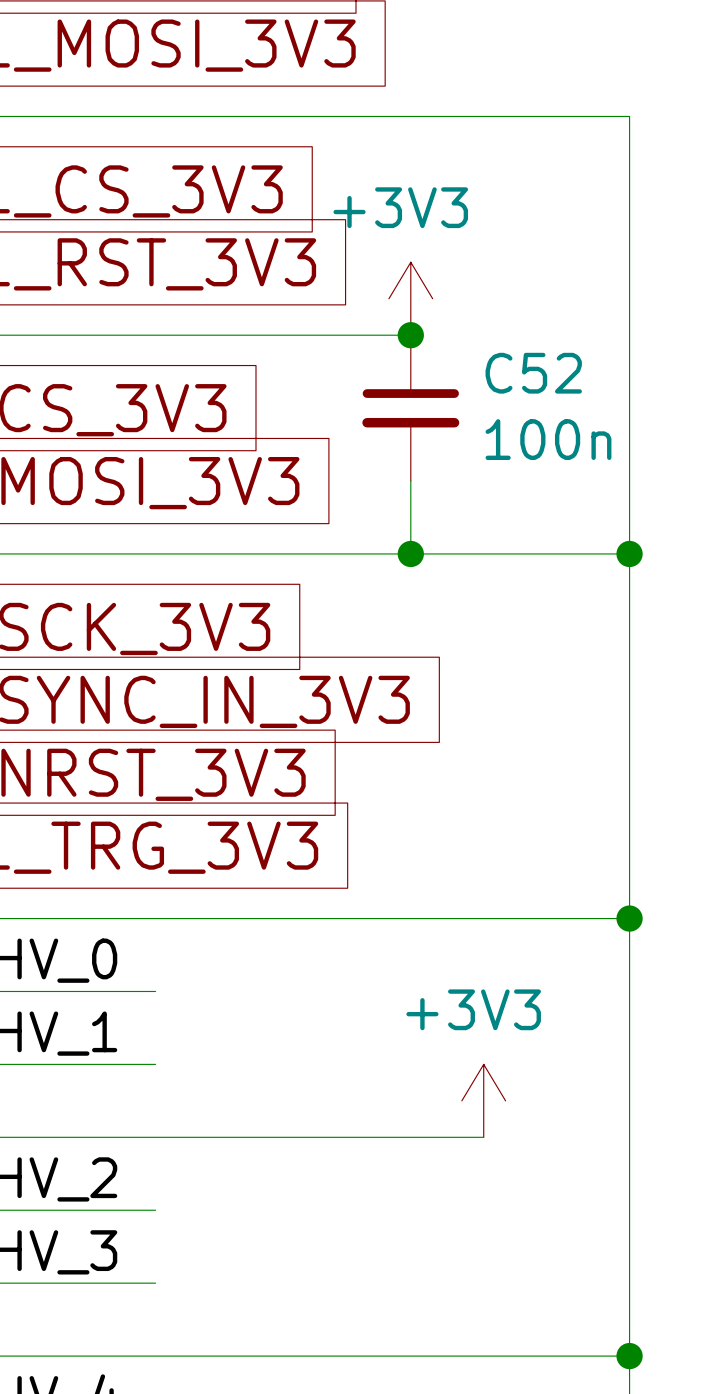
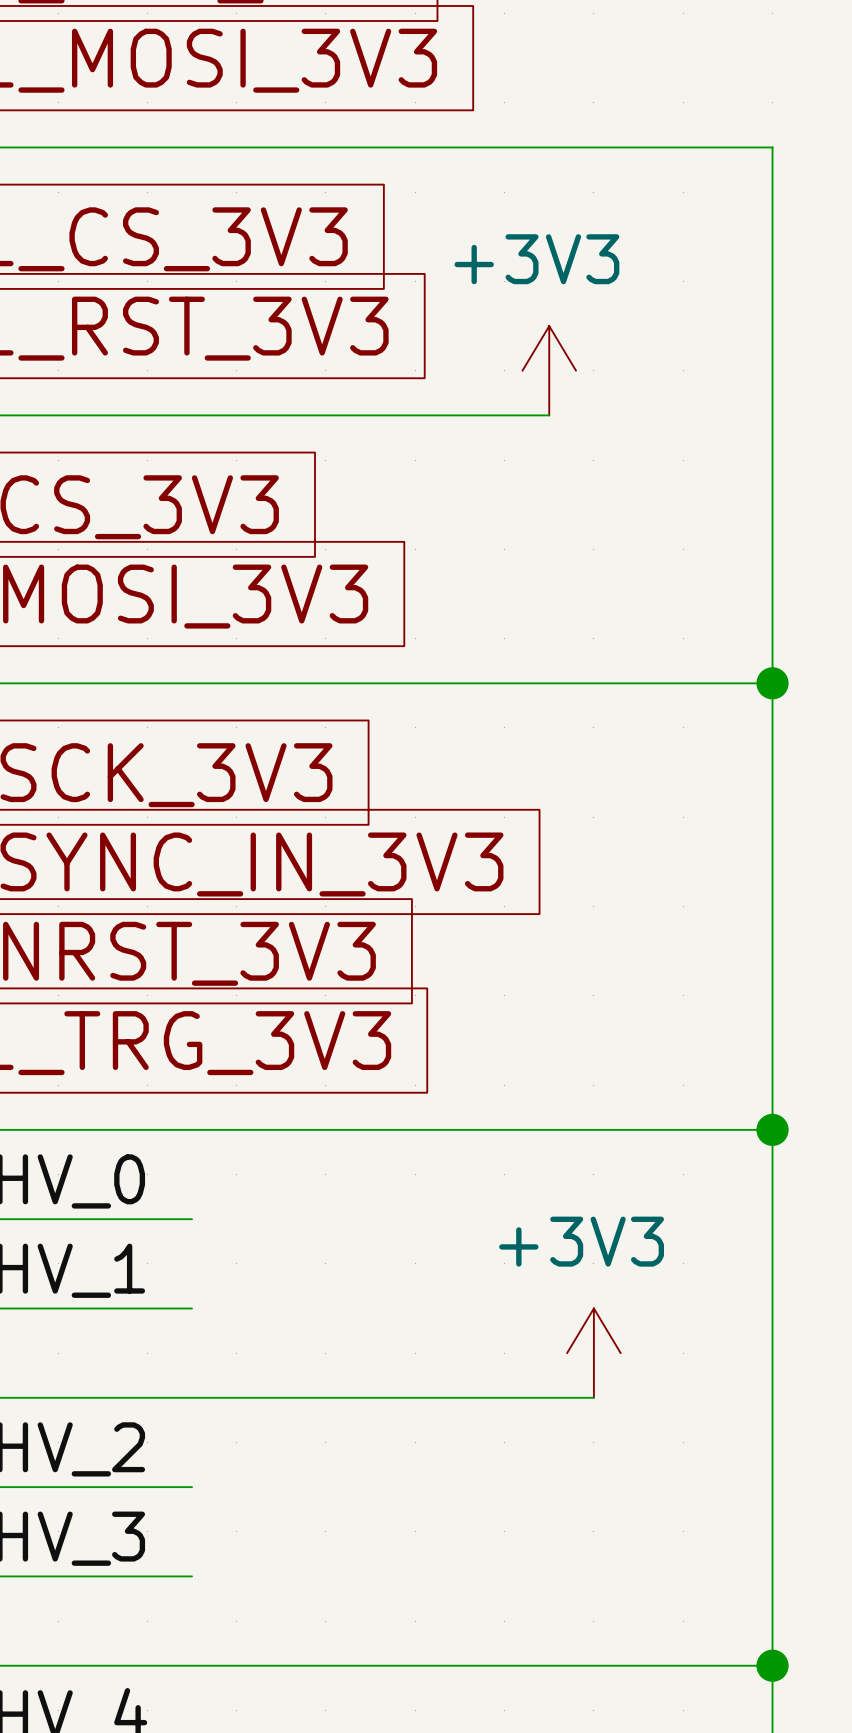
power symbol position: +3V3 (410, 298) -> +3V3 (549, 370)
wire: none -> (504, 415) (549, 415)
junction: (410, 335) -> none
C52: 100n (410, 408) -> none
wire: (410, 481) (410, 553) -> none
junction: (410, 553) -> none

